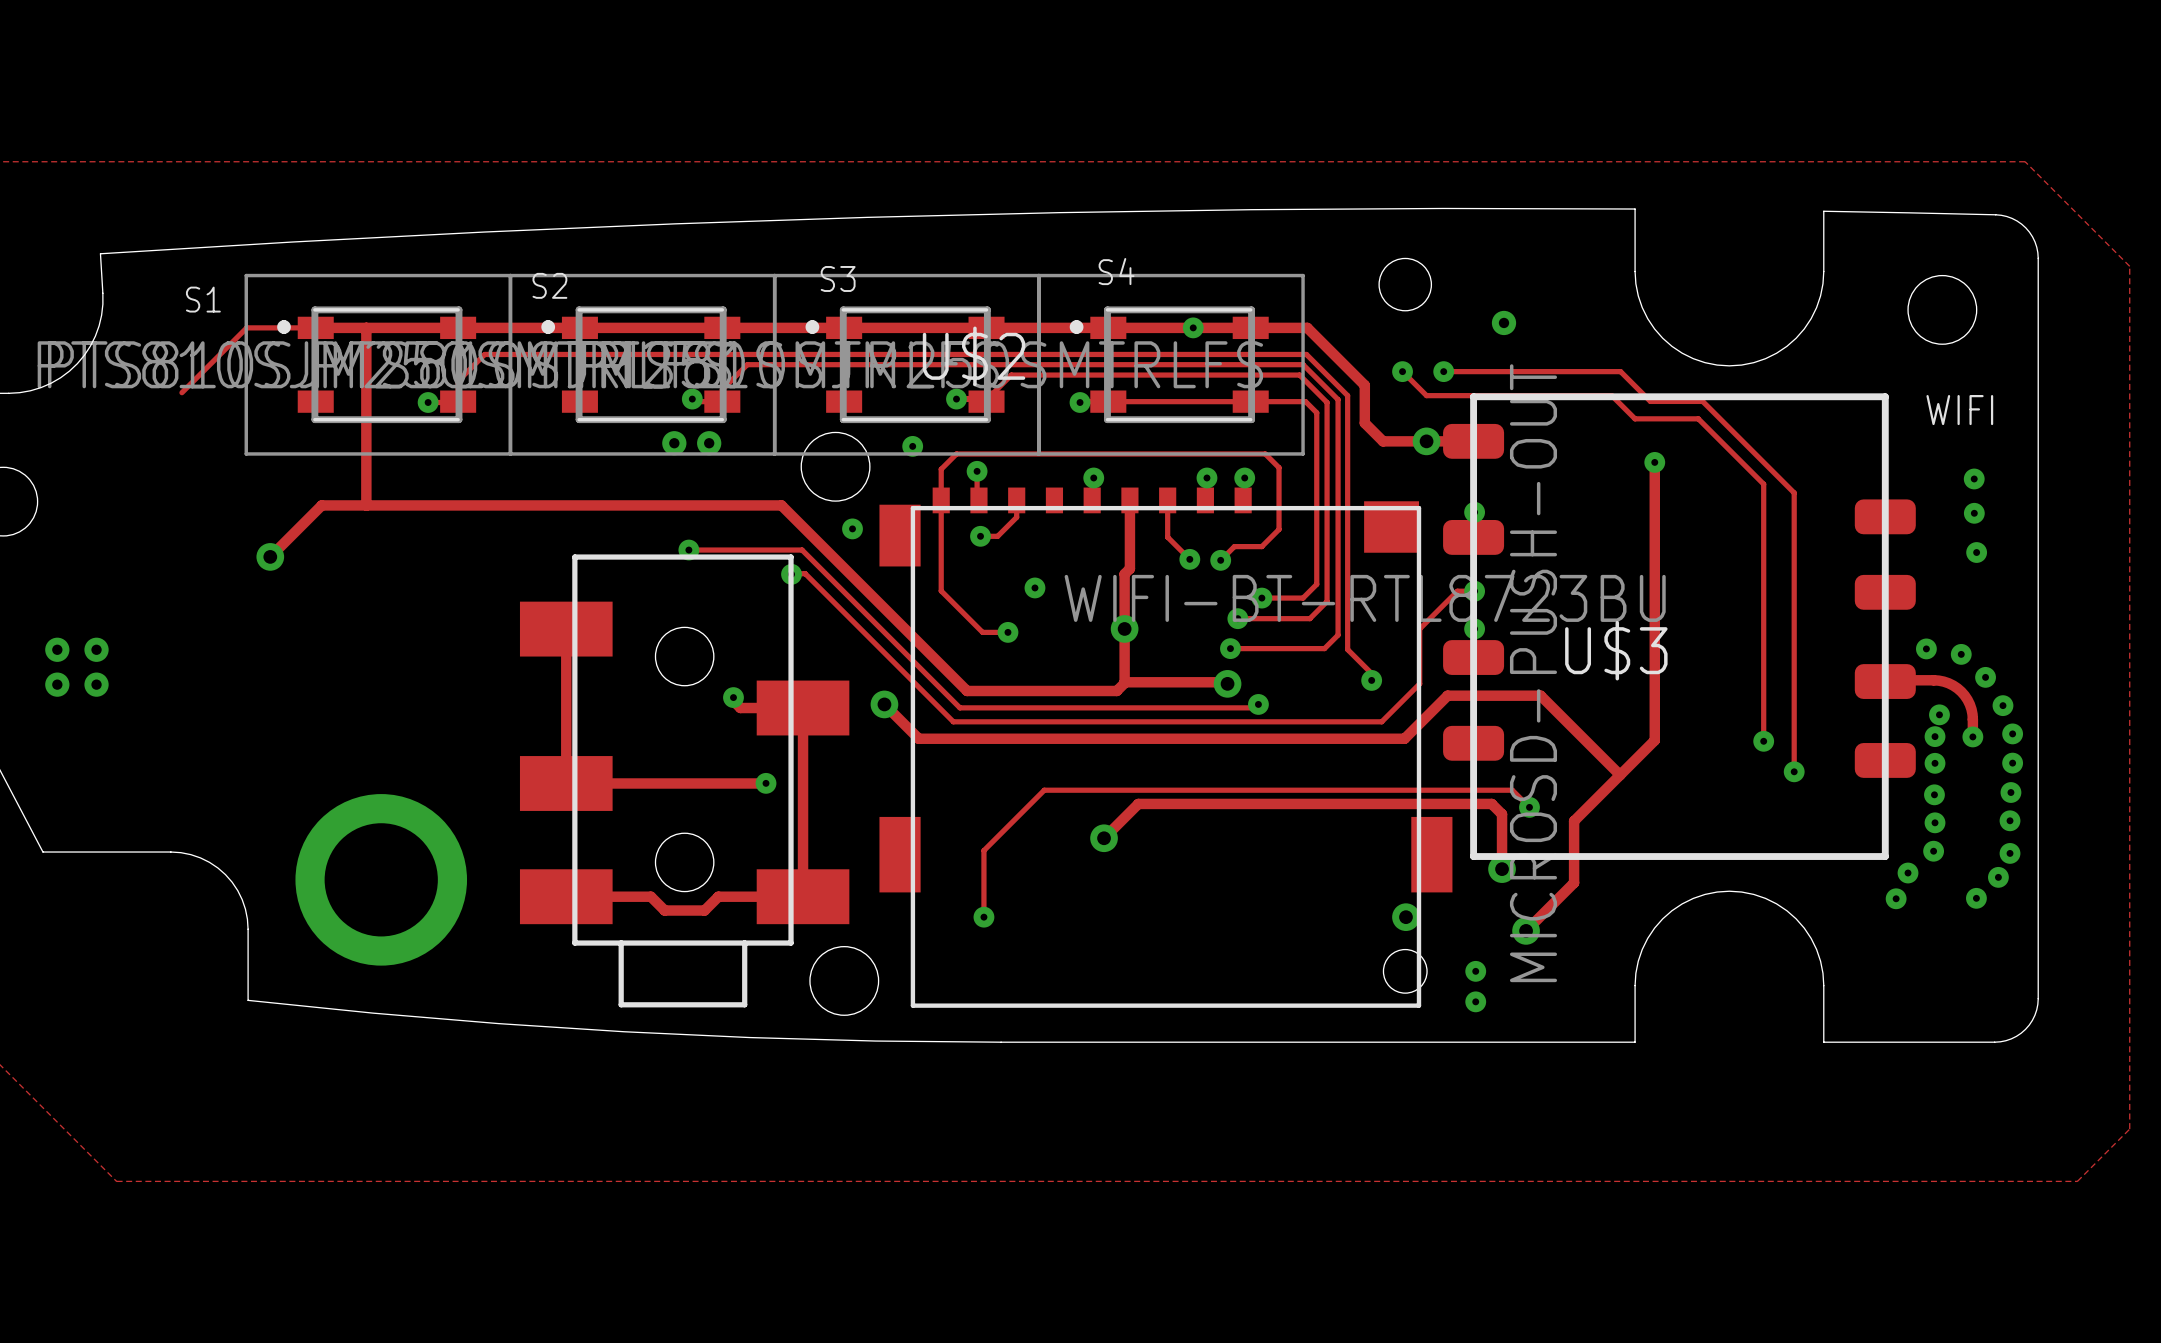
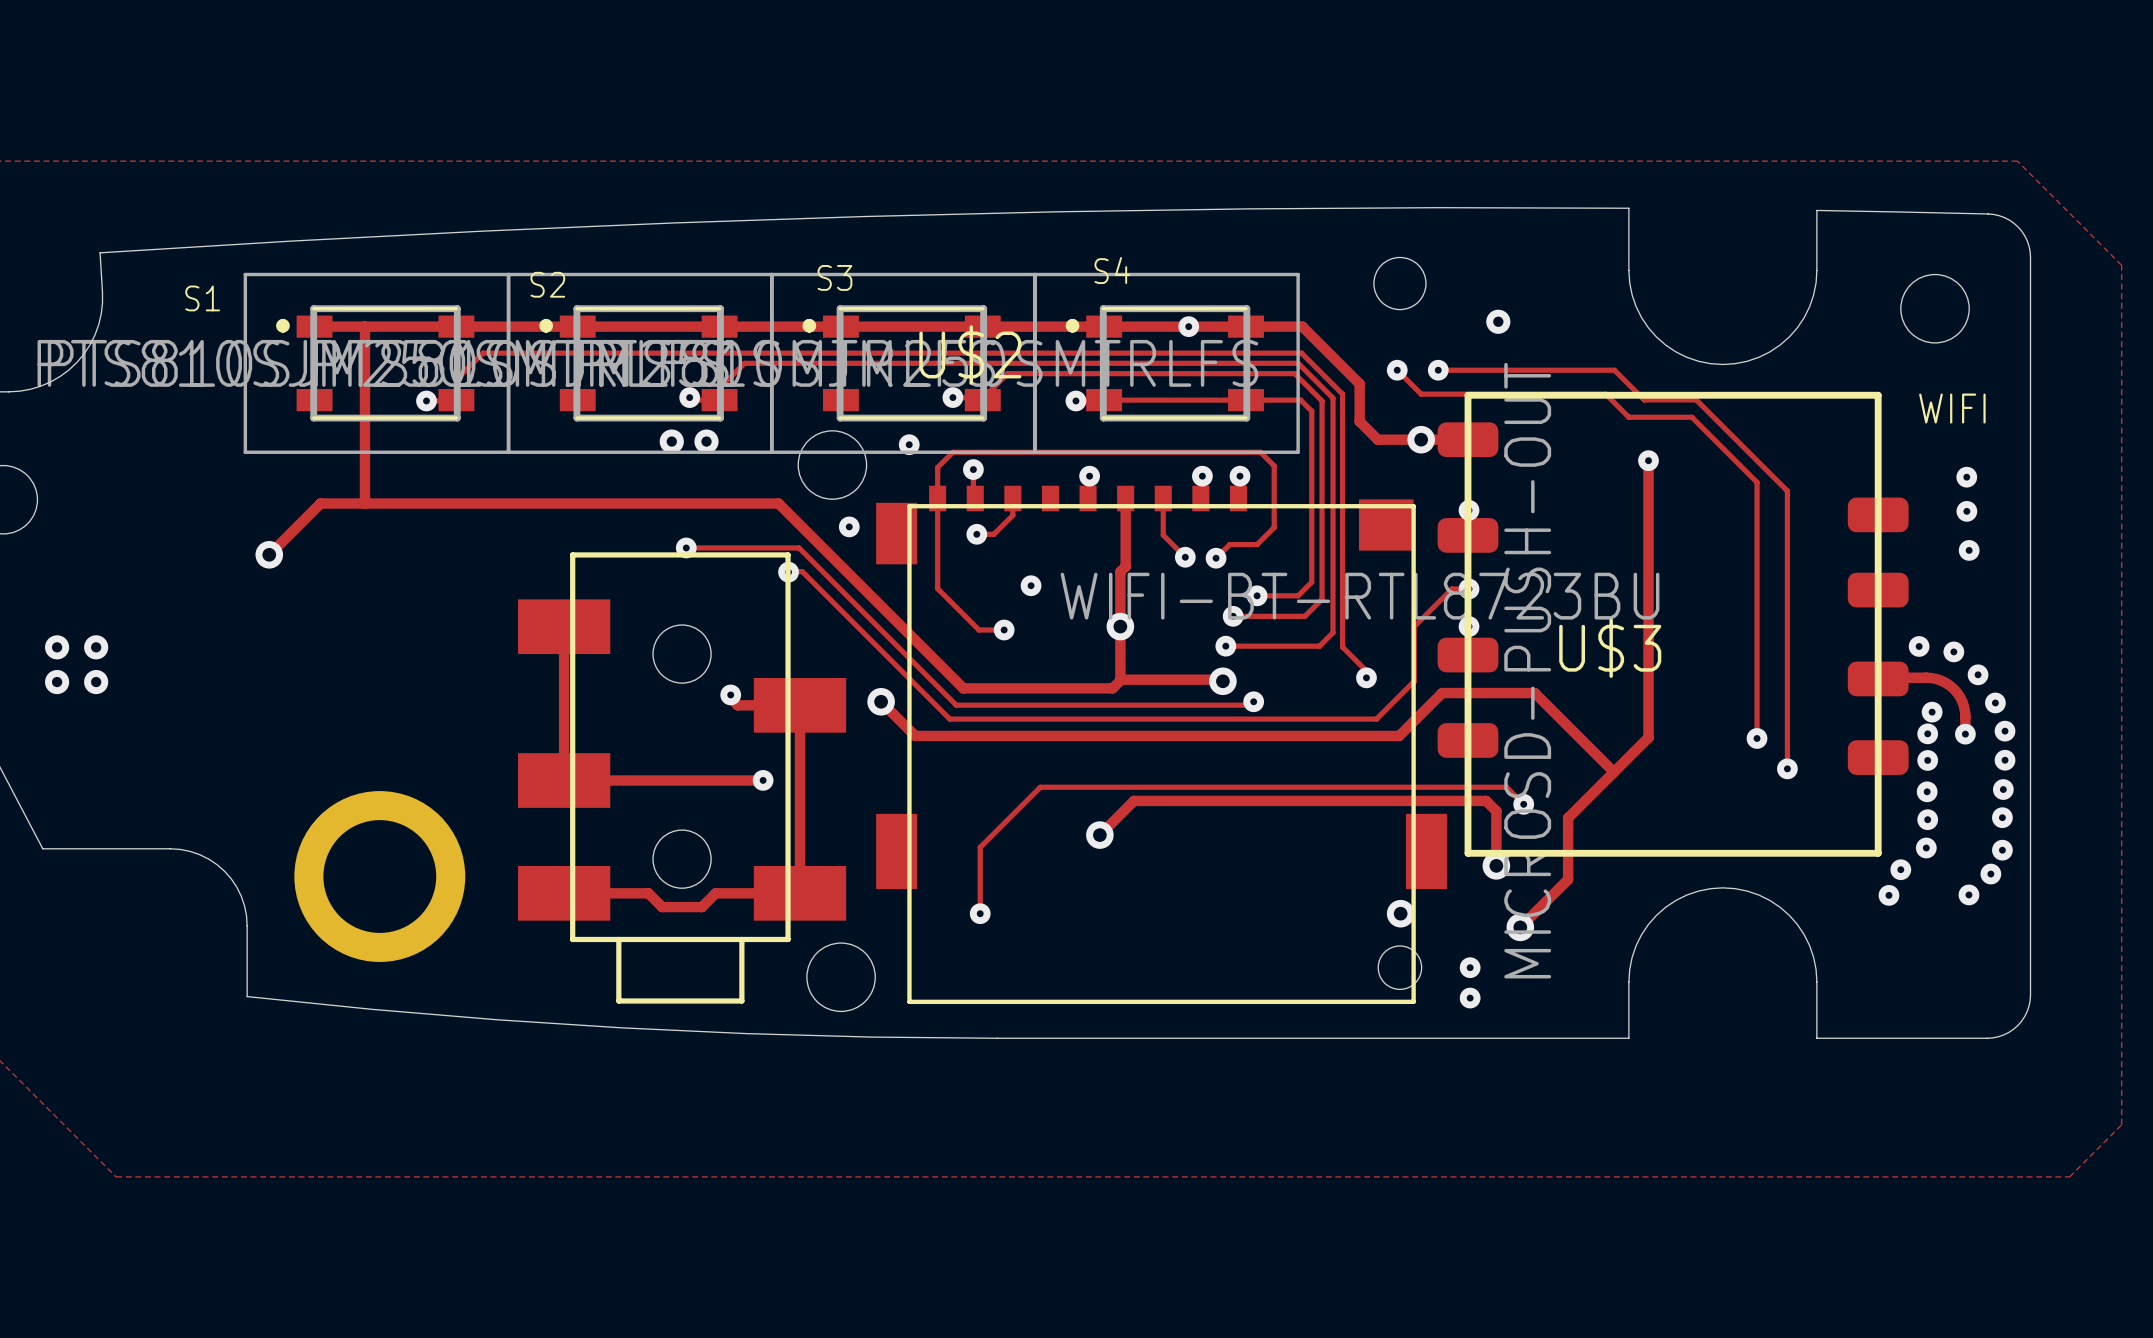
track: (315, 327) (246, 327) (181, 392) -> none

